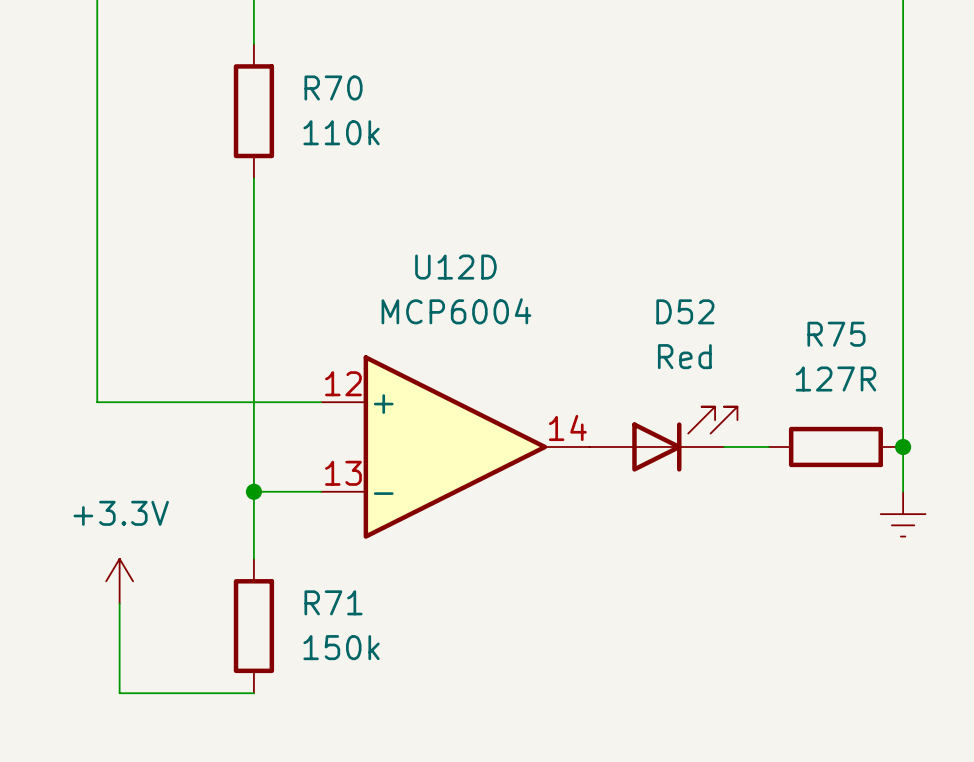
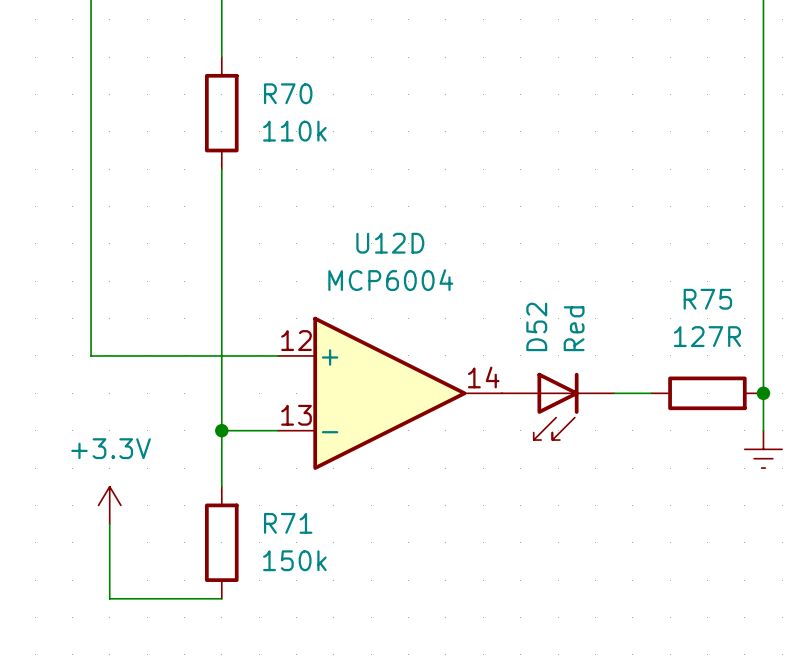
D52 name position: D52 (685, 311) -> D52 (536, 326)
D52 symbol: [589, 406, 738, 472] -> [501, 372, 615, 441]

